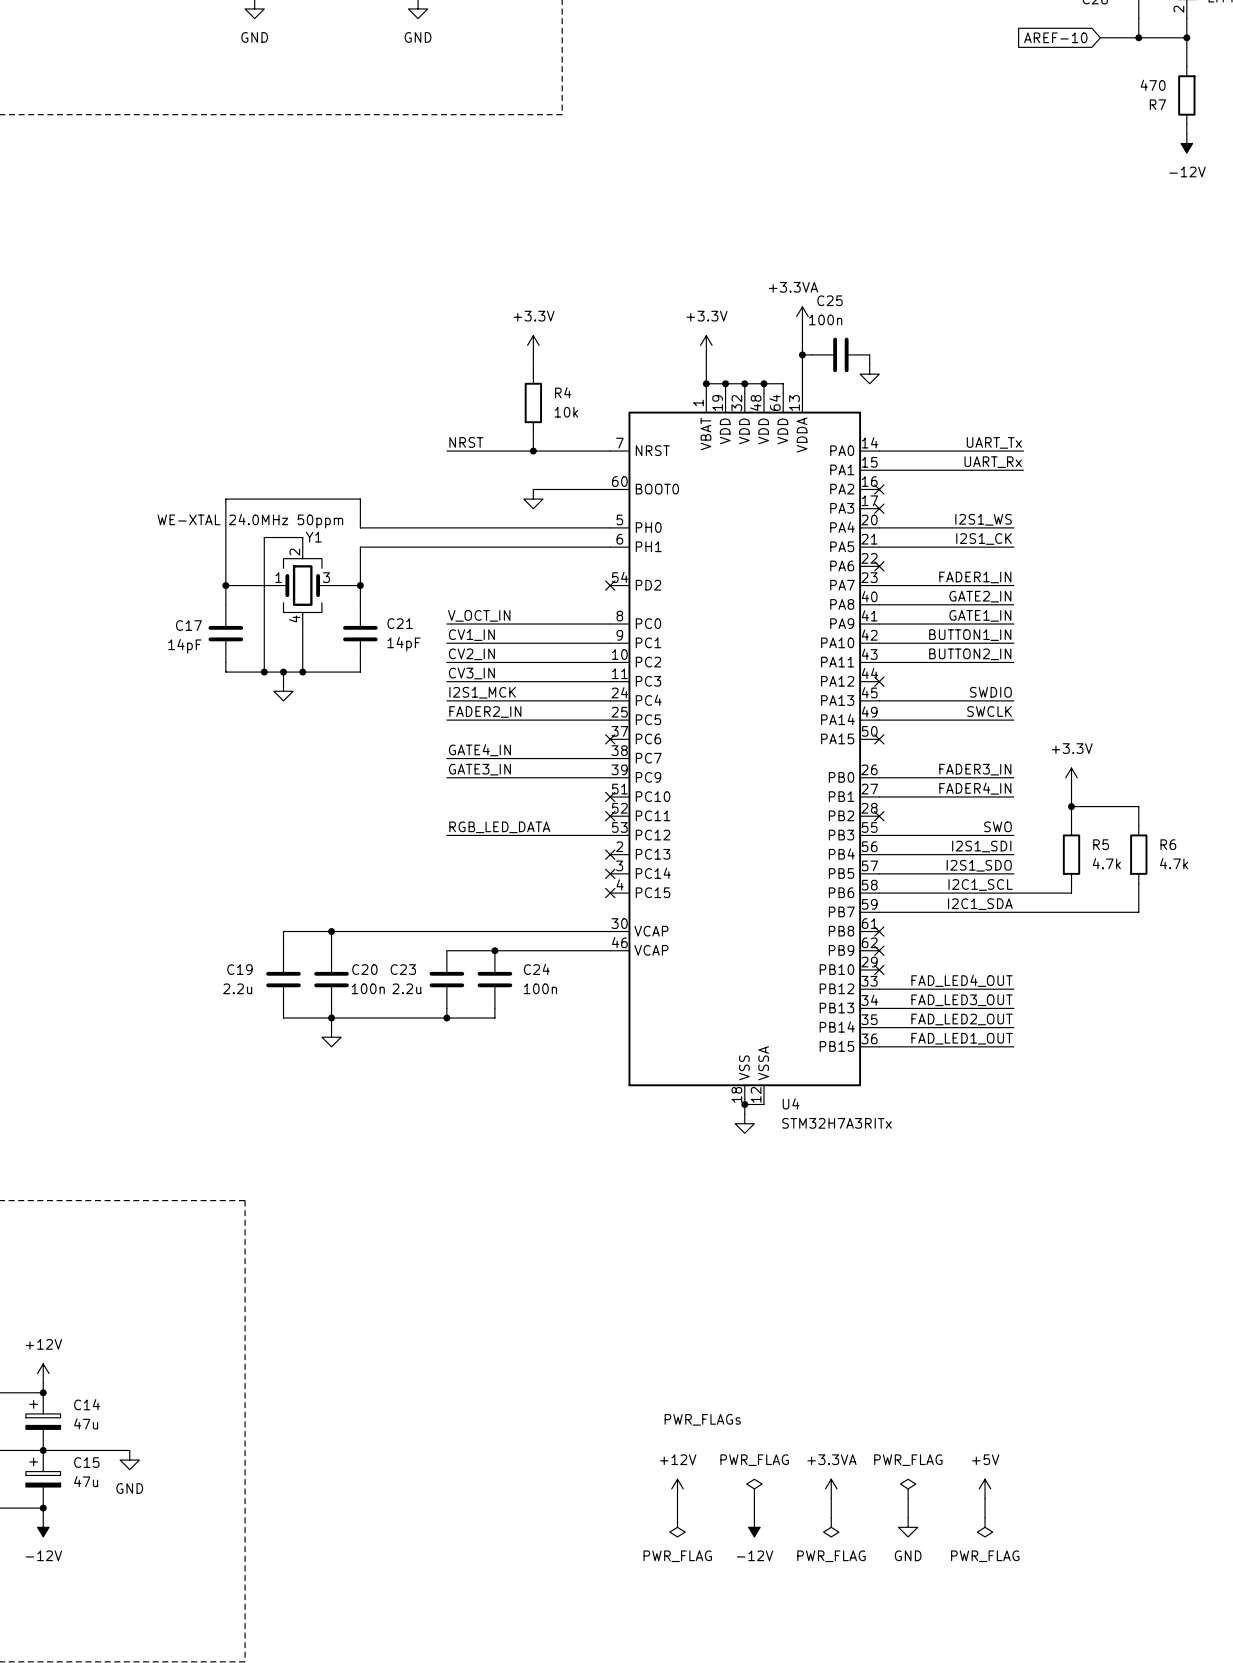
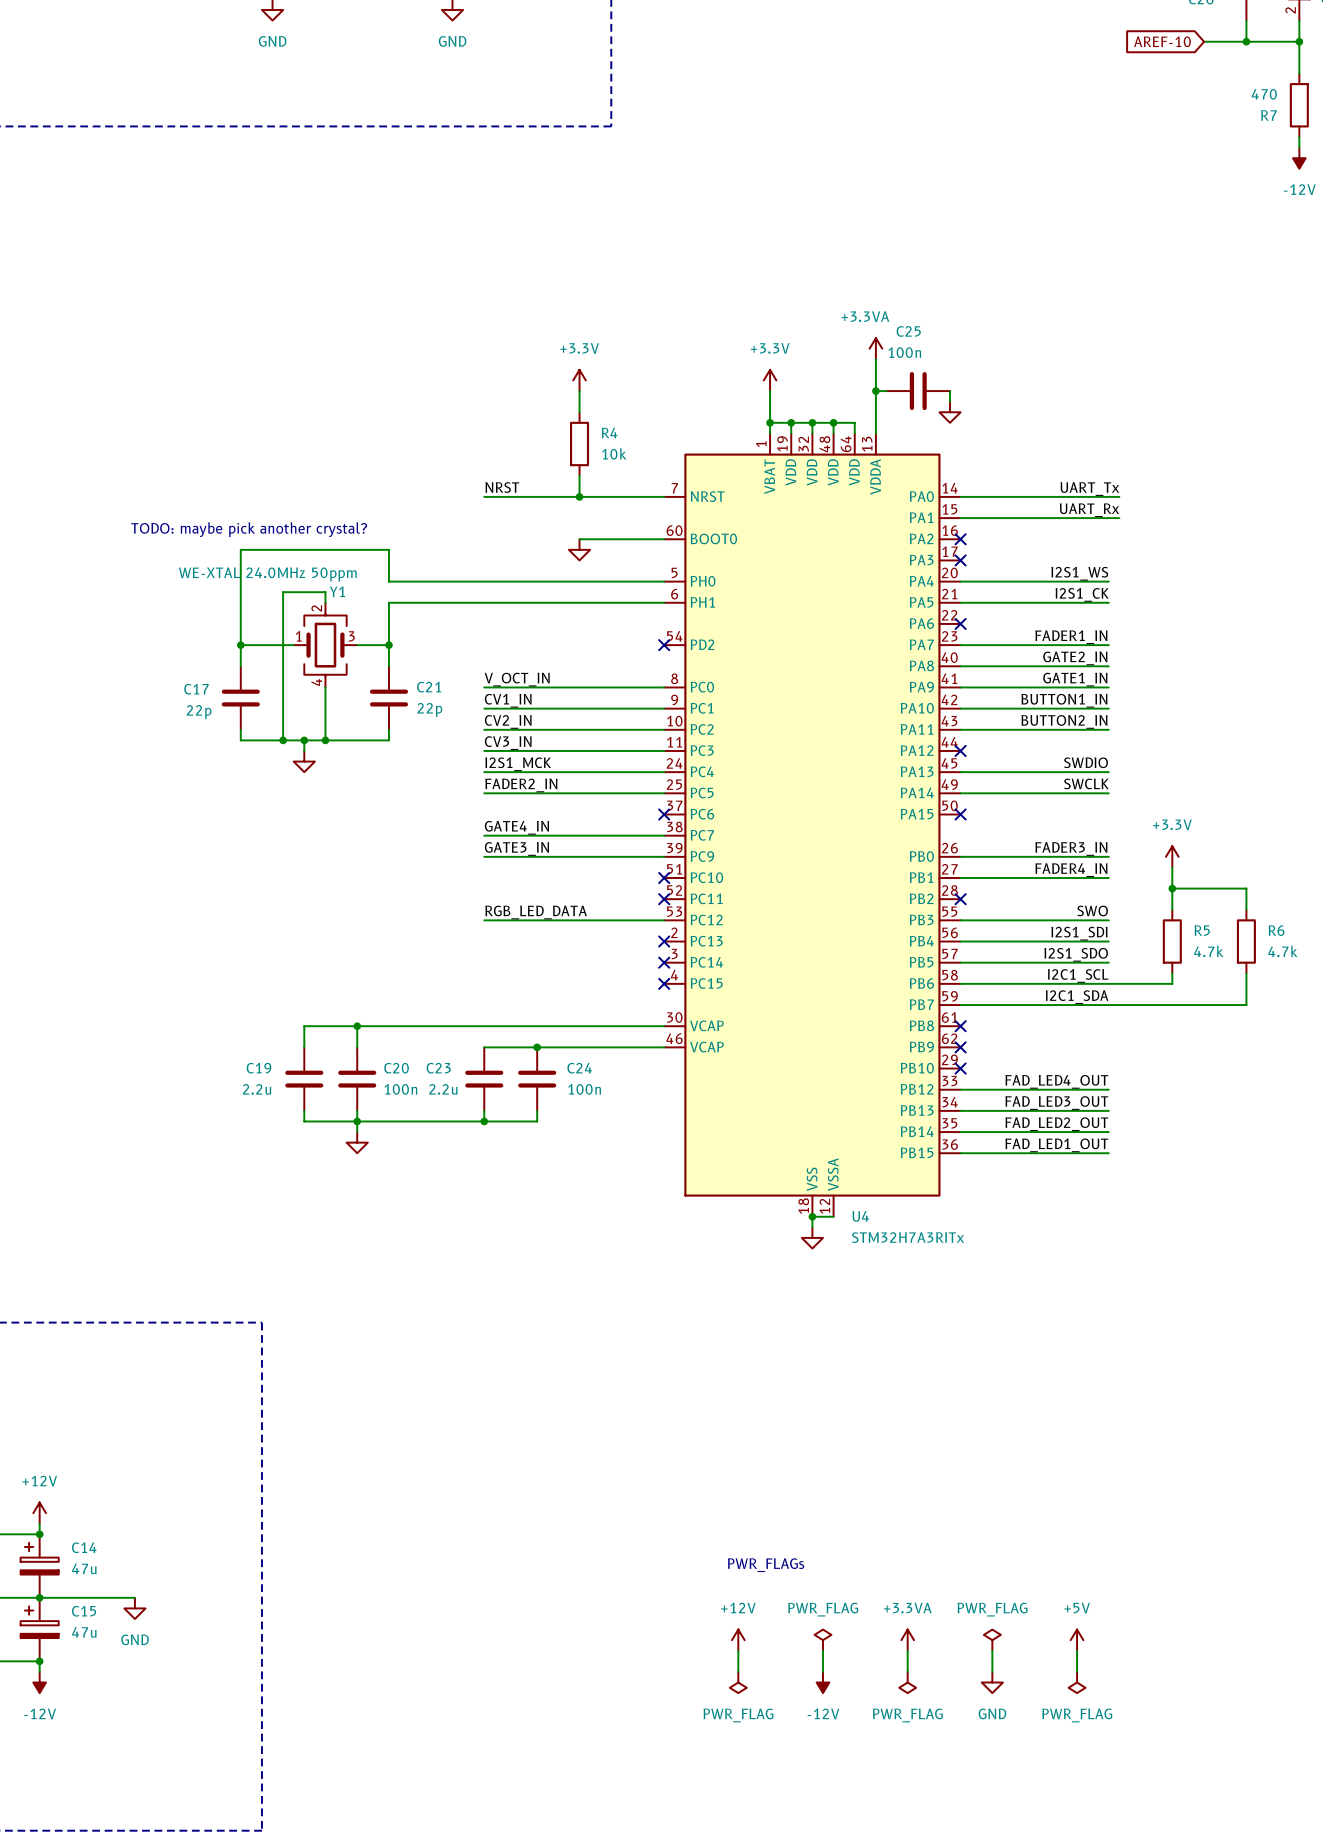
text: none -> TODO: maybe pick another crystal? (249, 529)
C21 value: 14pF (403, 644) -> 22p (429, 709)
C17 value: 14pF (184, 646) -> 22p (199, 712)

